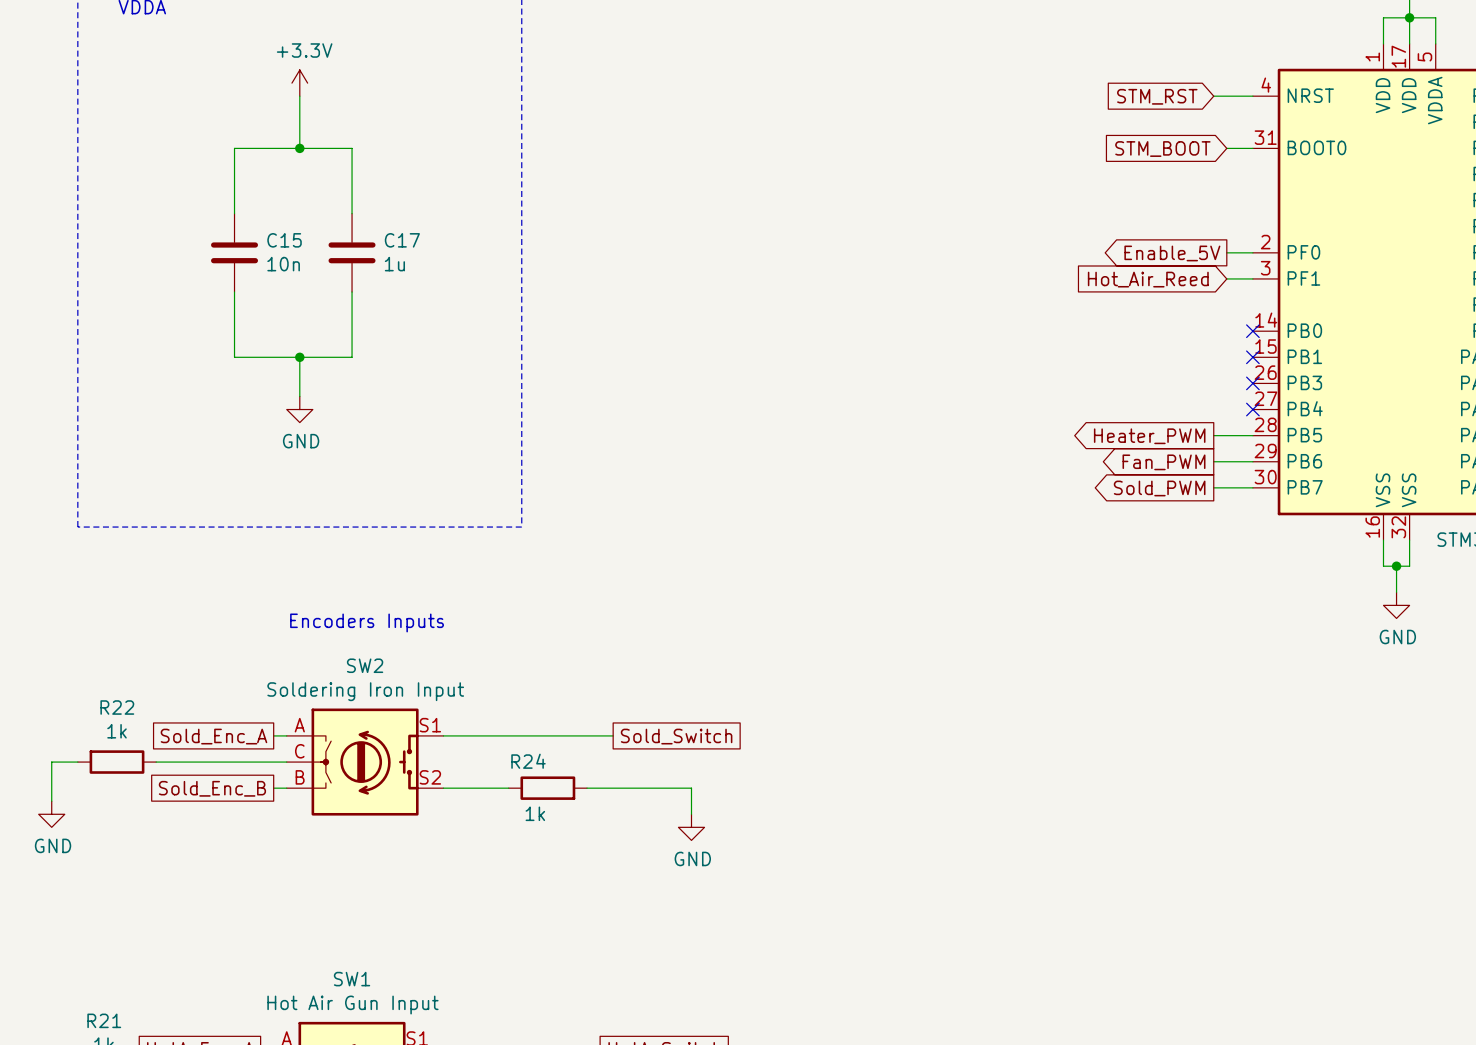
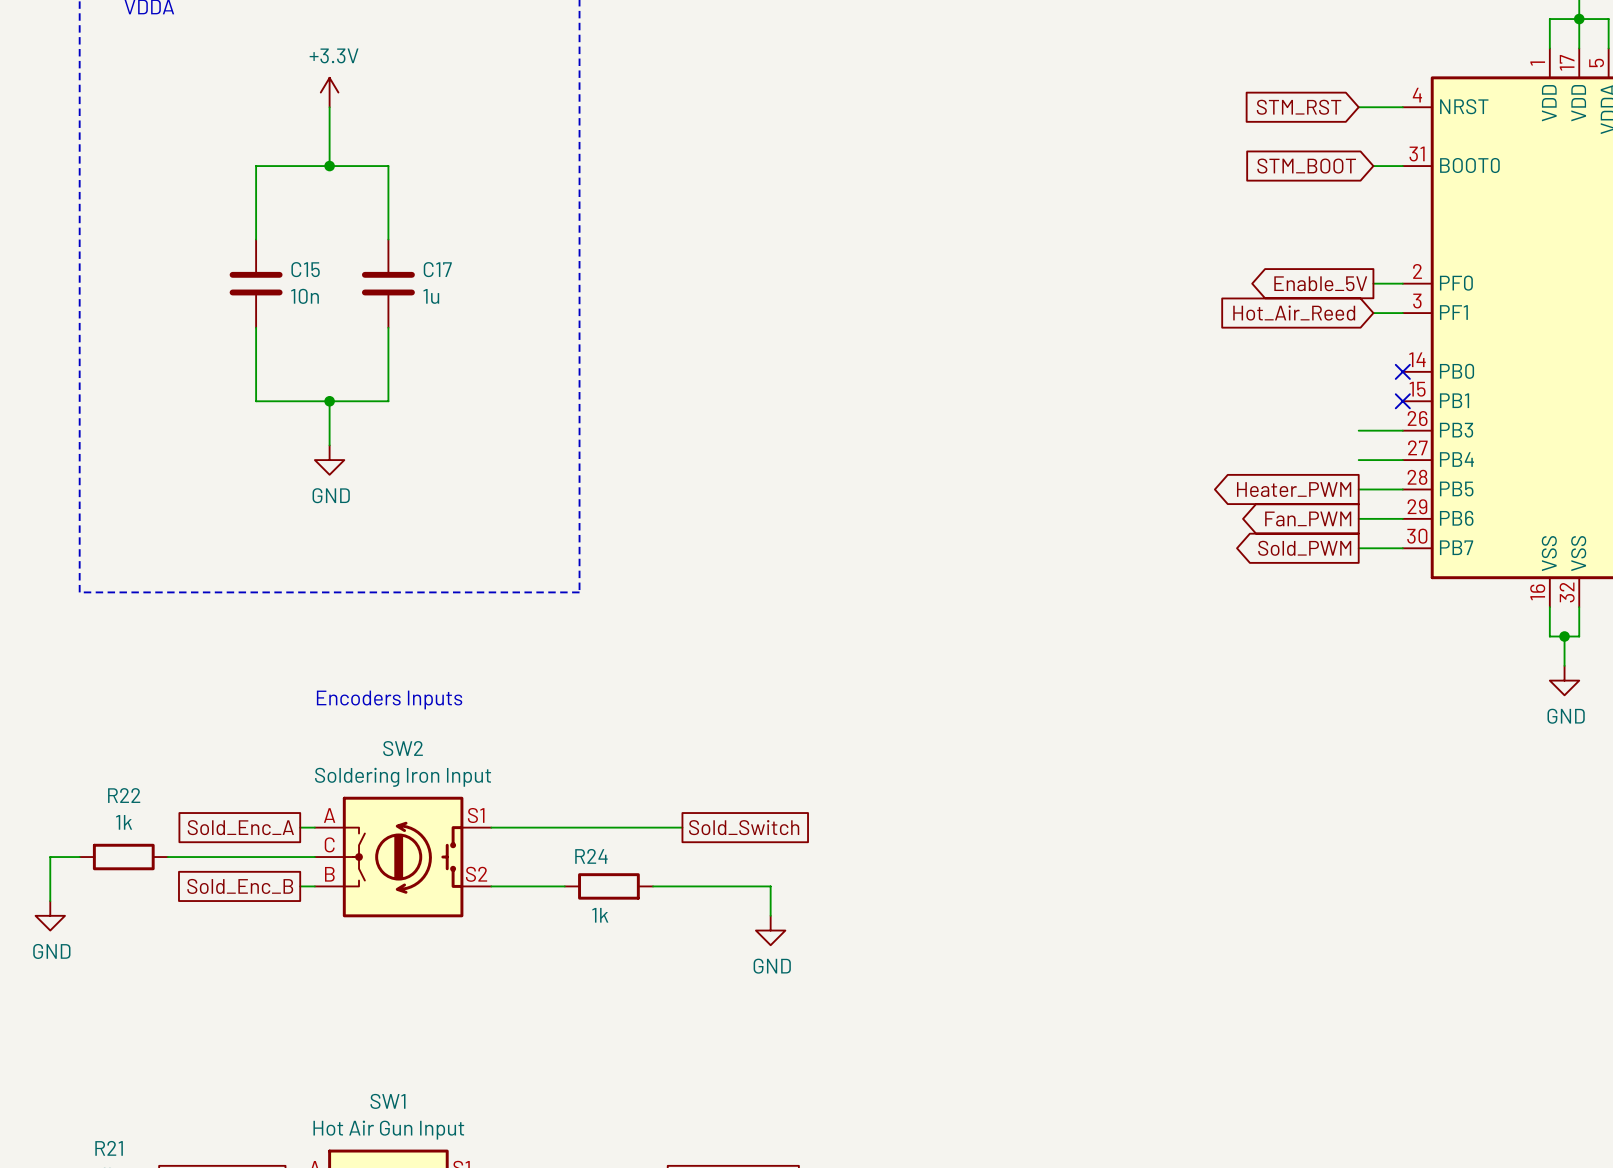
wire: none -> (1358, 430) (1402, 430)
no-connect mark: (1252, 383) -> none
wire: none -> (1358, 460) (1402, 460)
no-connect mark: (1252, 409) -> none

